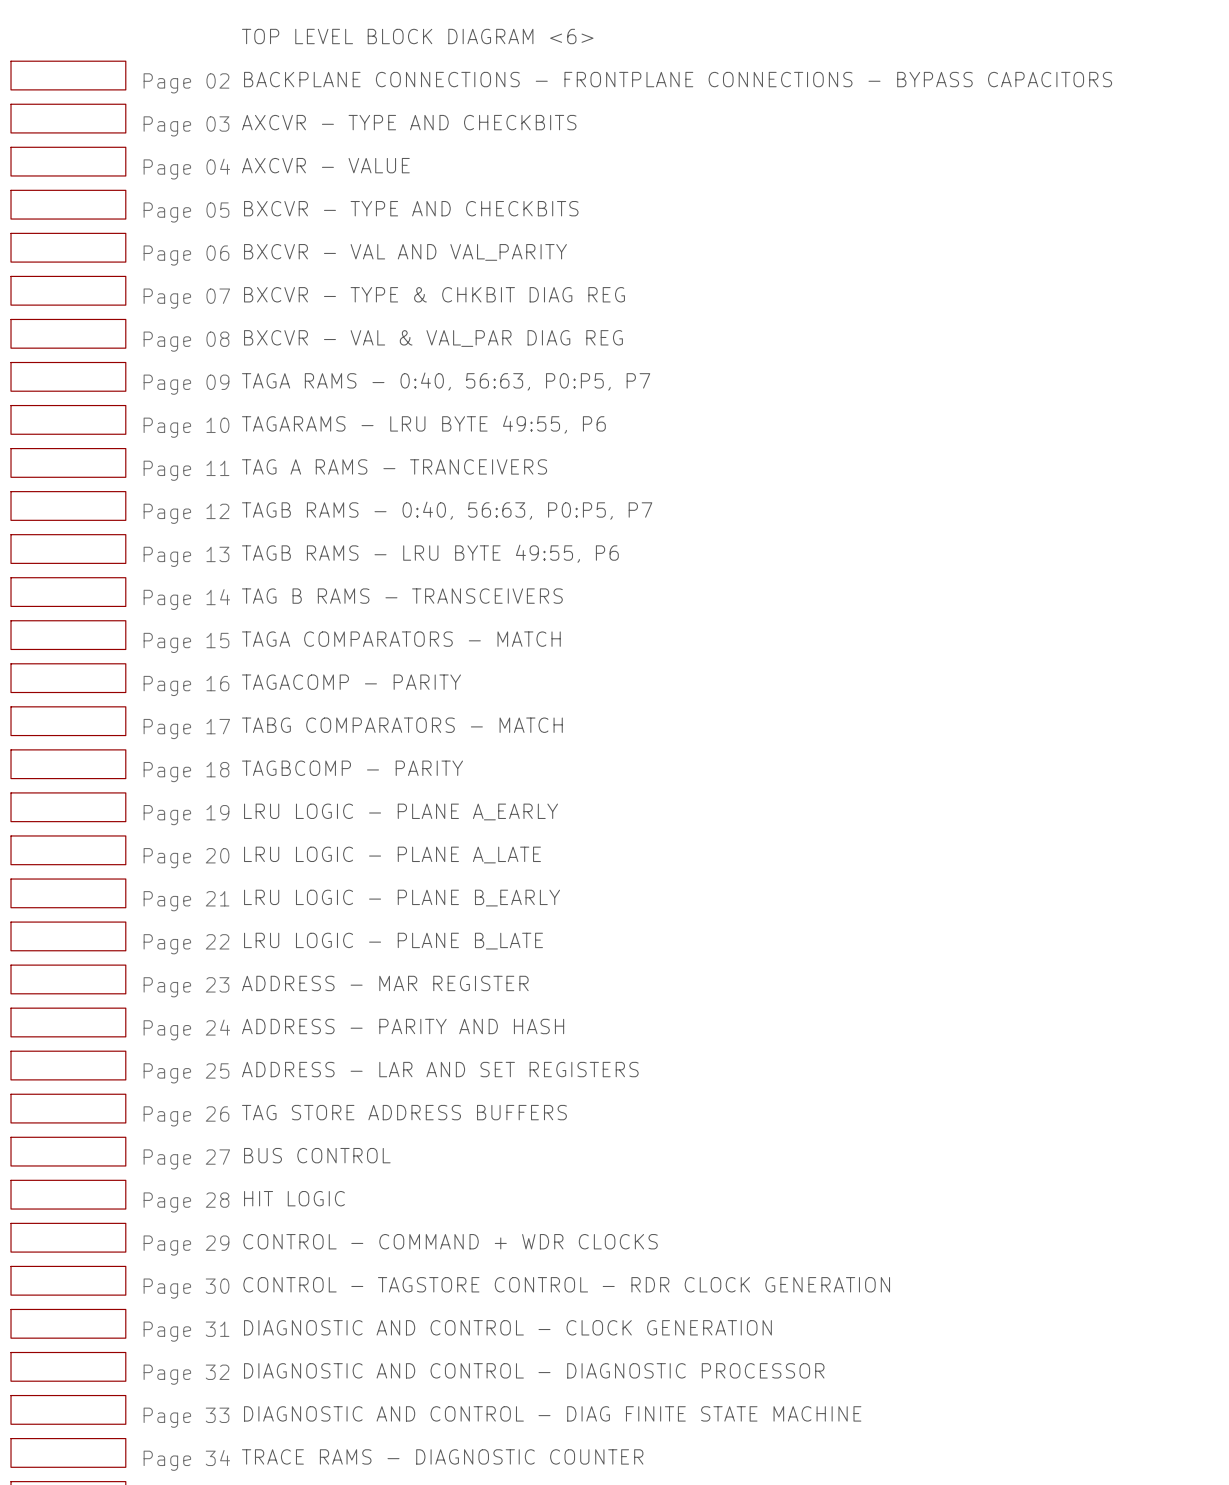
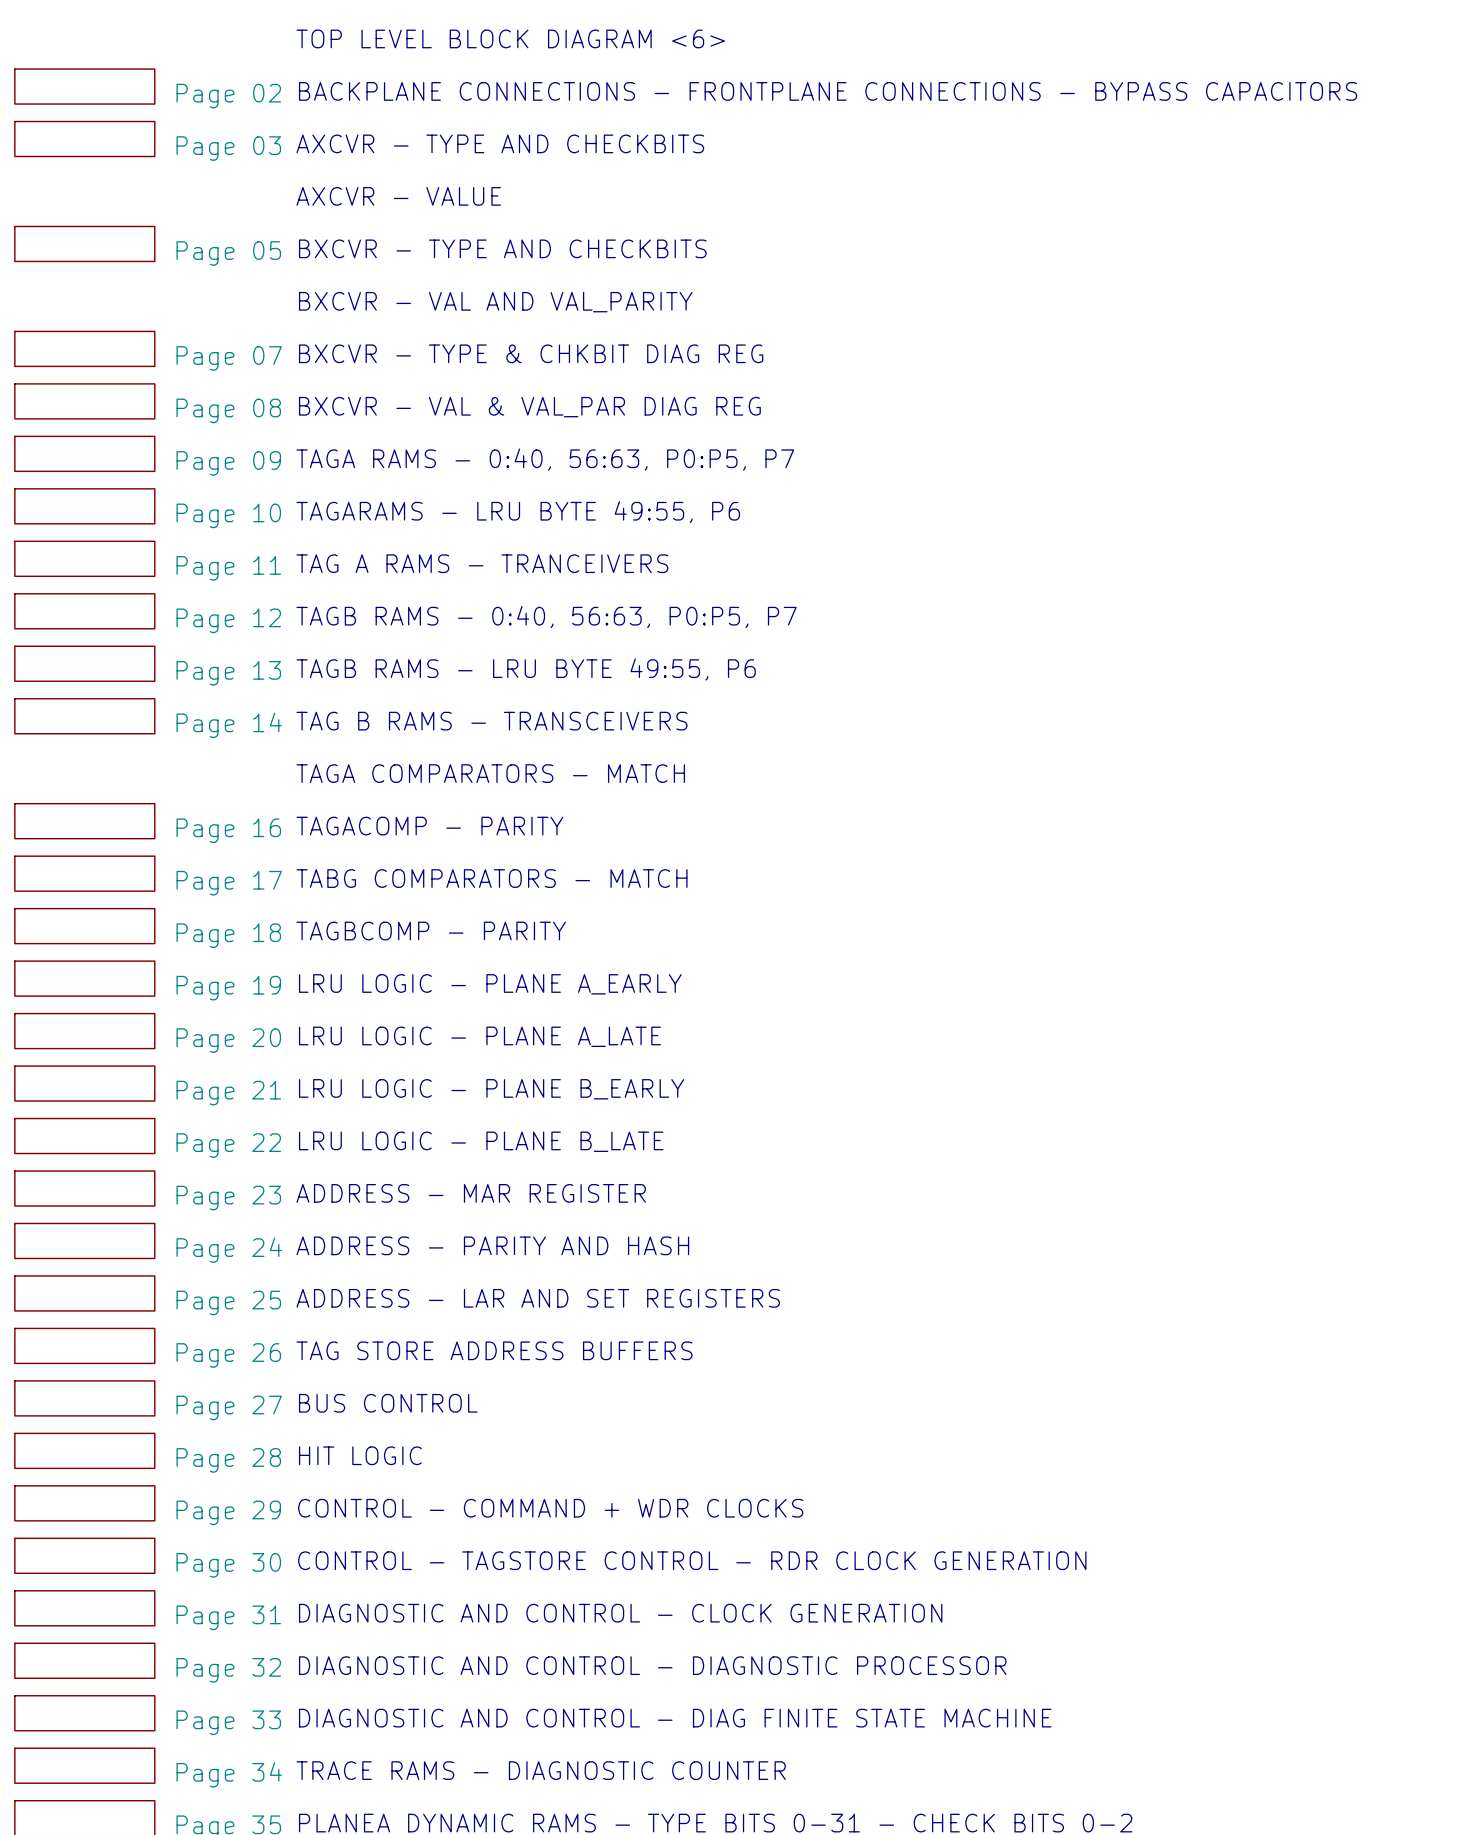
sheet Page 04: (68, 161) -> none
sheet Page 06: (68, 247) -> none
sheet Page 15: (68, 635) -> none

